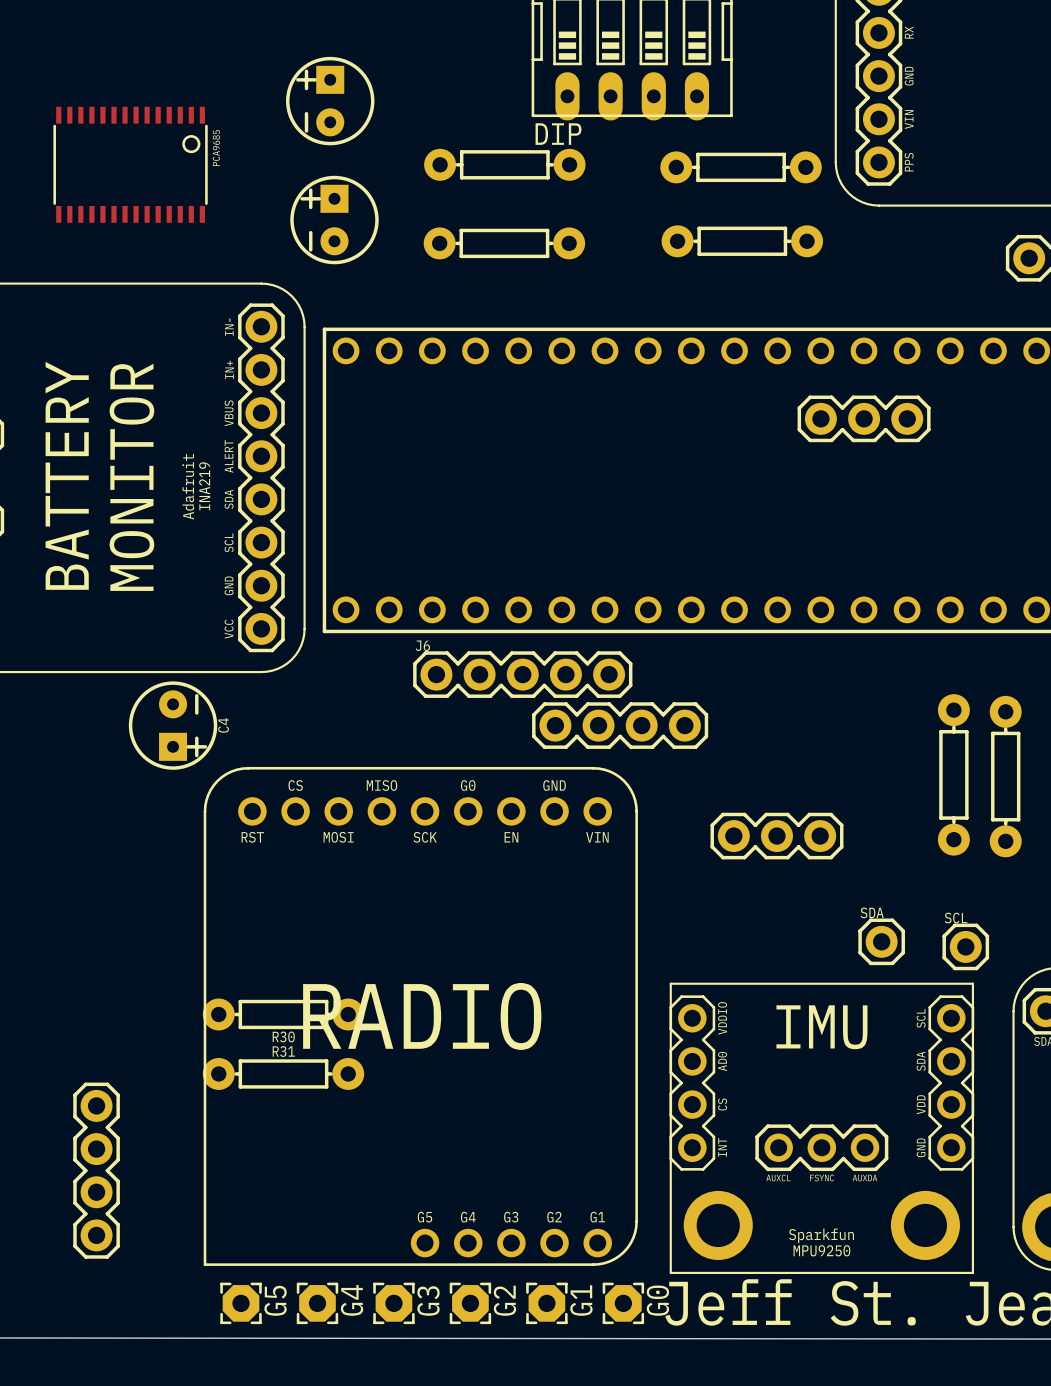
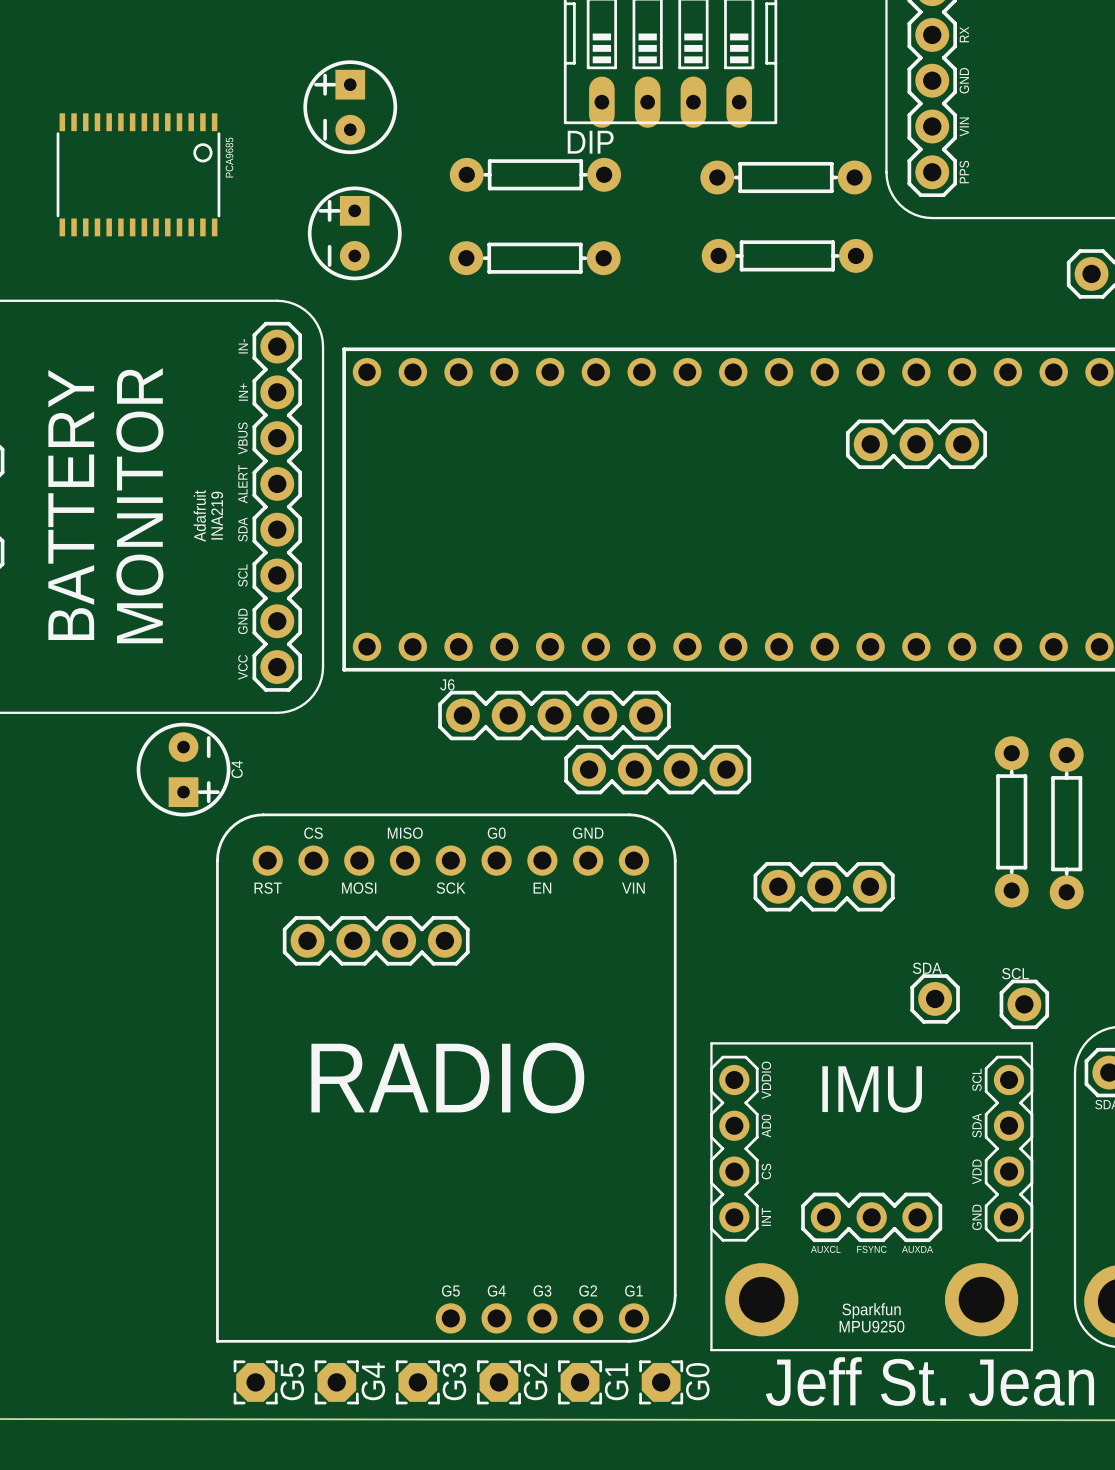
R30: (283, 1014) -> none
R31: (283, 1073) -> none
part rotation: 0° (96, 1170) -> 90° clockwise (376, 940)
part position: (96, 1170) -> (376, 940)

